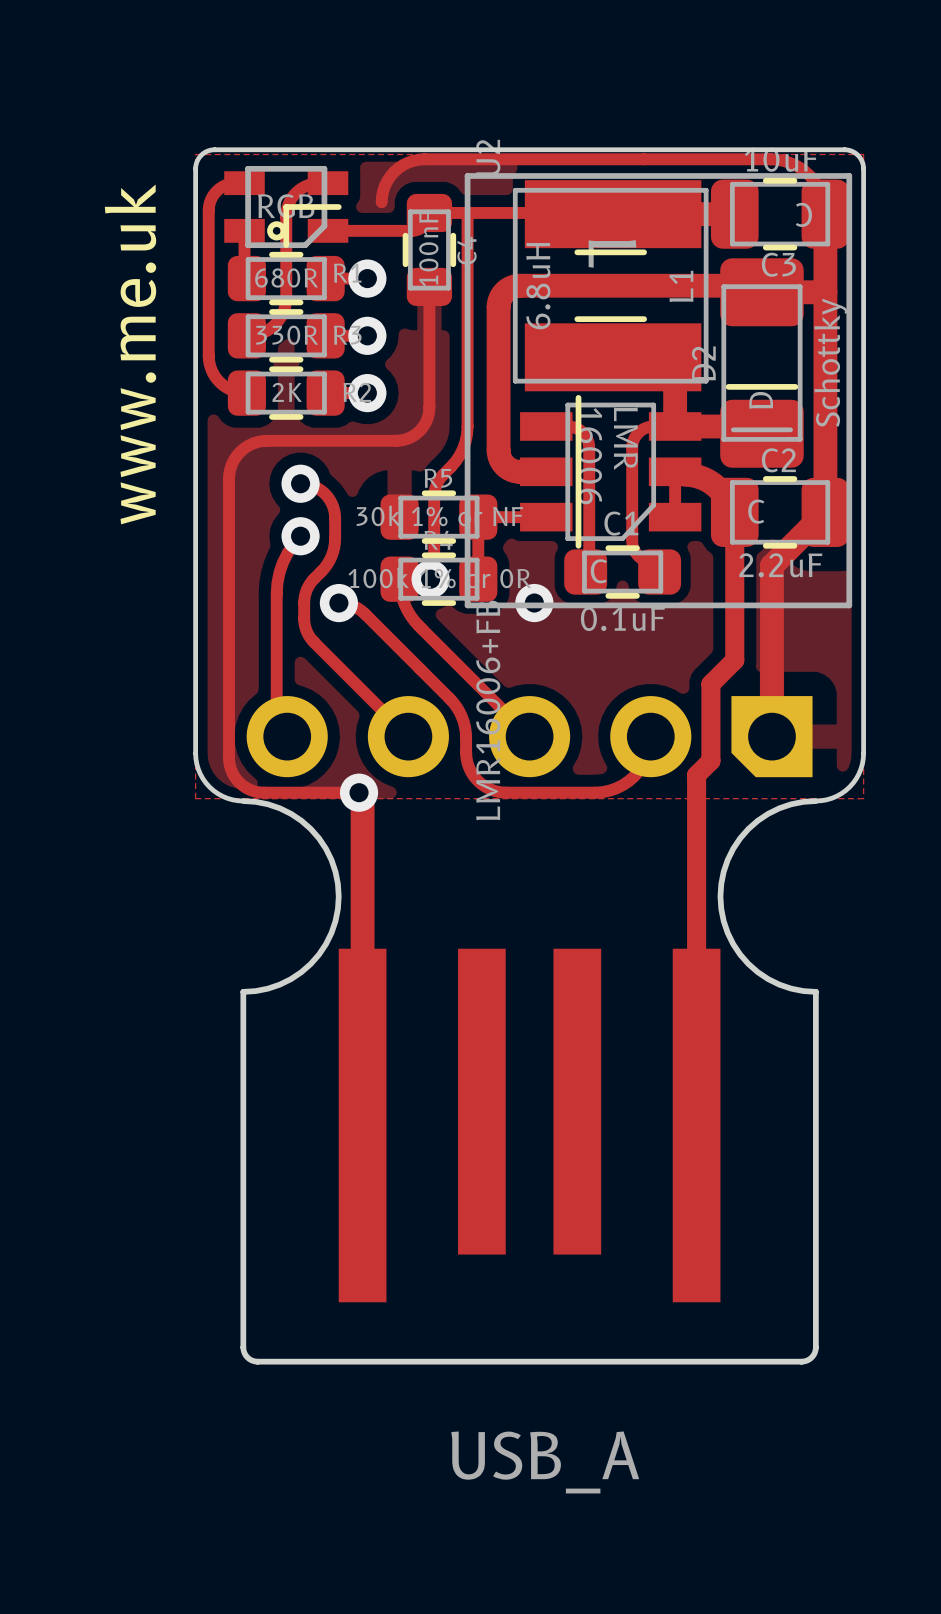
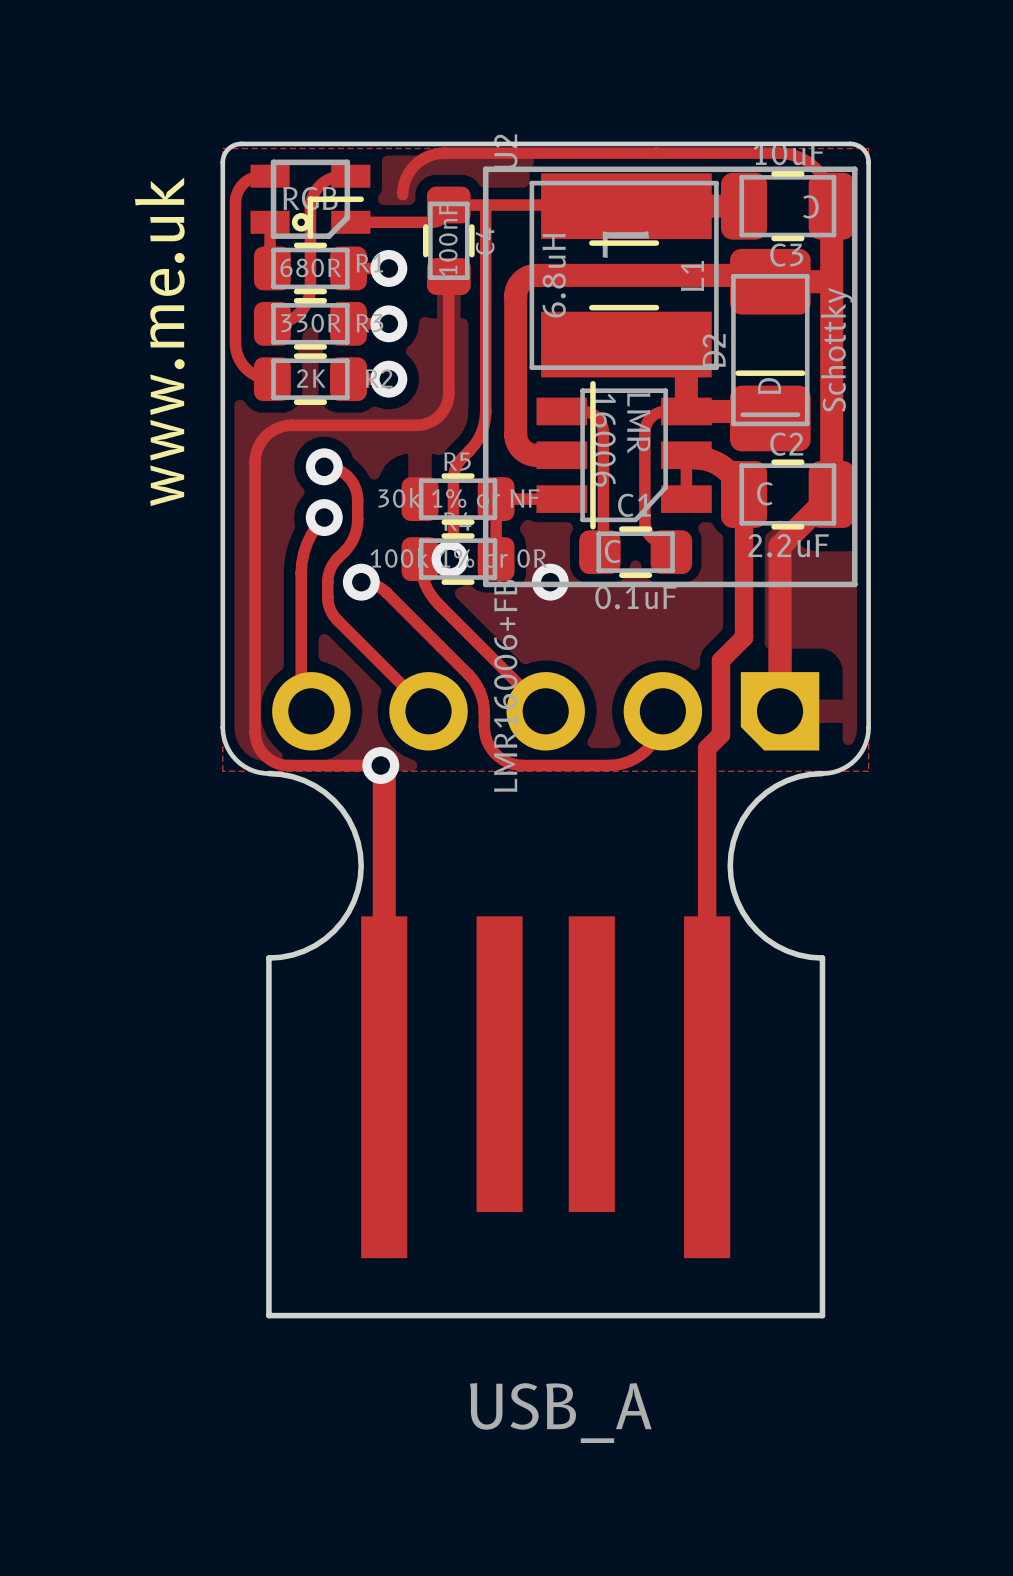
part footprint: [240, 798, 819, 1365] -> [266, 770, 826, 1319]

